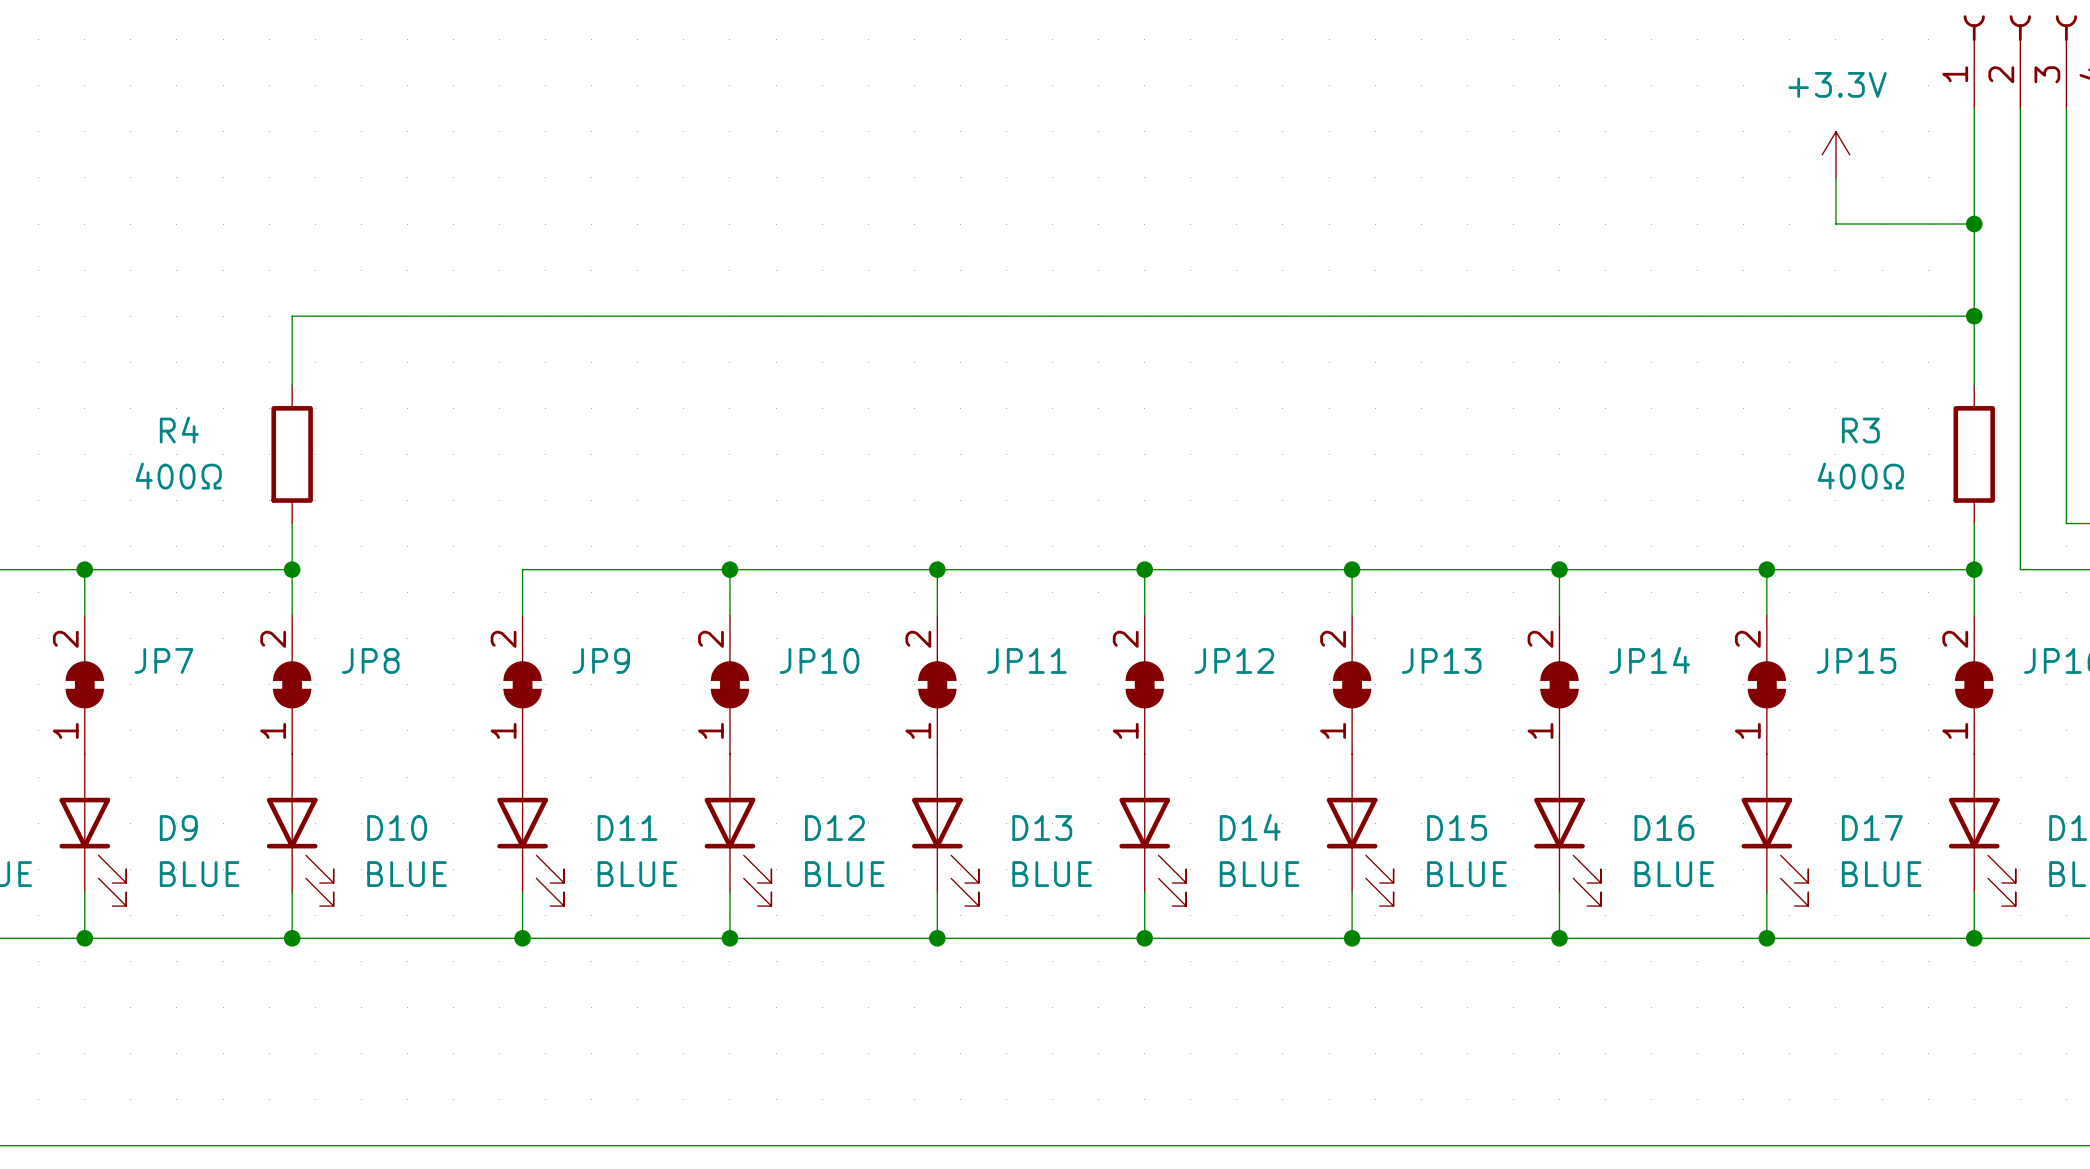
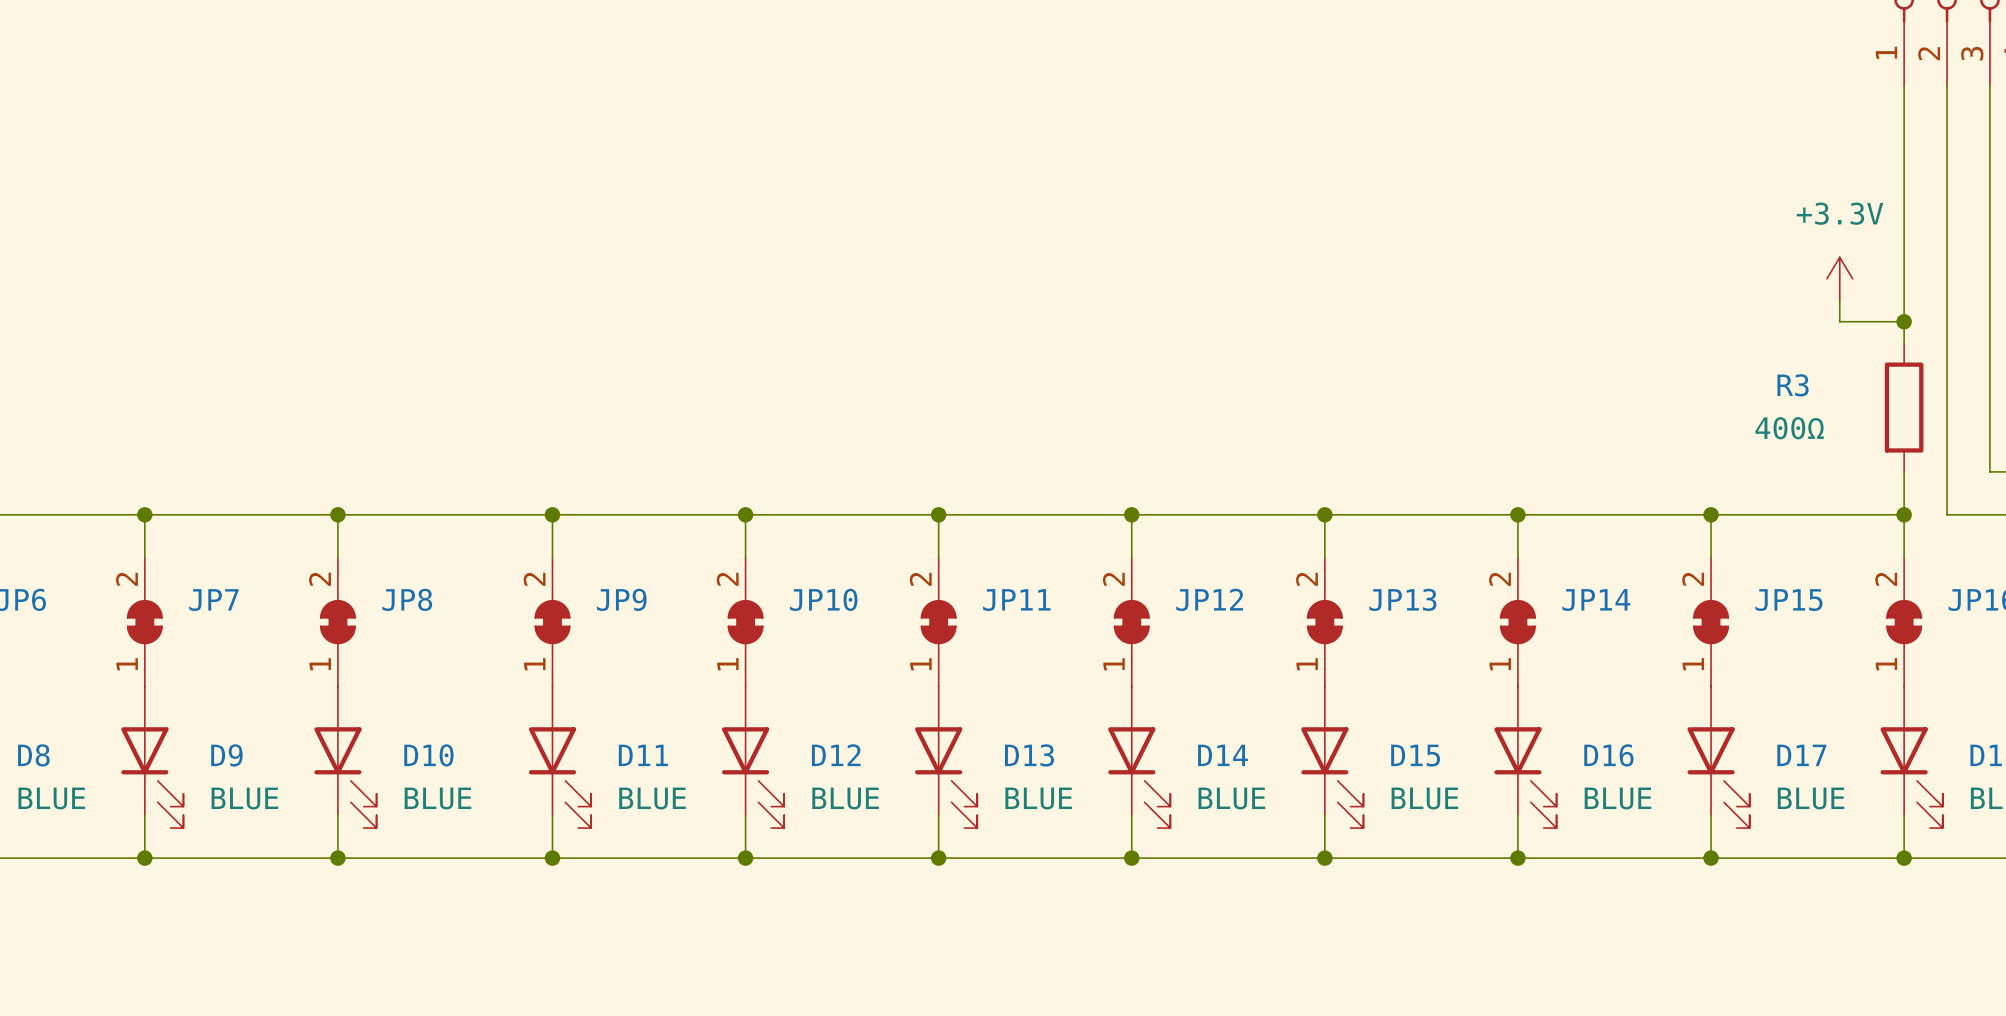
power symbol position: +3.3V (1835, 154) -> +3.3V (1839, 278)
wire: (1835, 177) (1835, 224) (1974, 224) -> none
junction: (1974, 224) -> none
wire: (1974, 316) (292, 316) (292, 385) -> none
junction position: (1974, 316) -> (1904, 321)
wire: none -> (1839, 300) (1839, 321) (1904, 321)
R4: 400Ω (292, 454) -> none
wire: (292, 523) (292, 569) -> (552, 514) (337, 514)
junction: none -> (552, 514)

